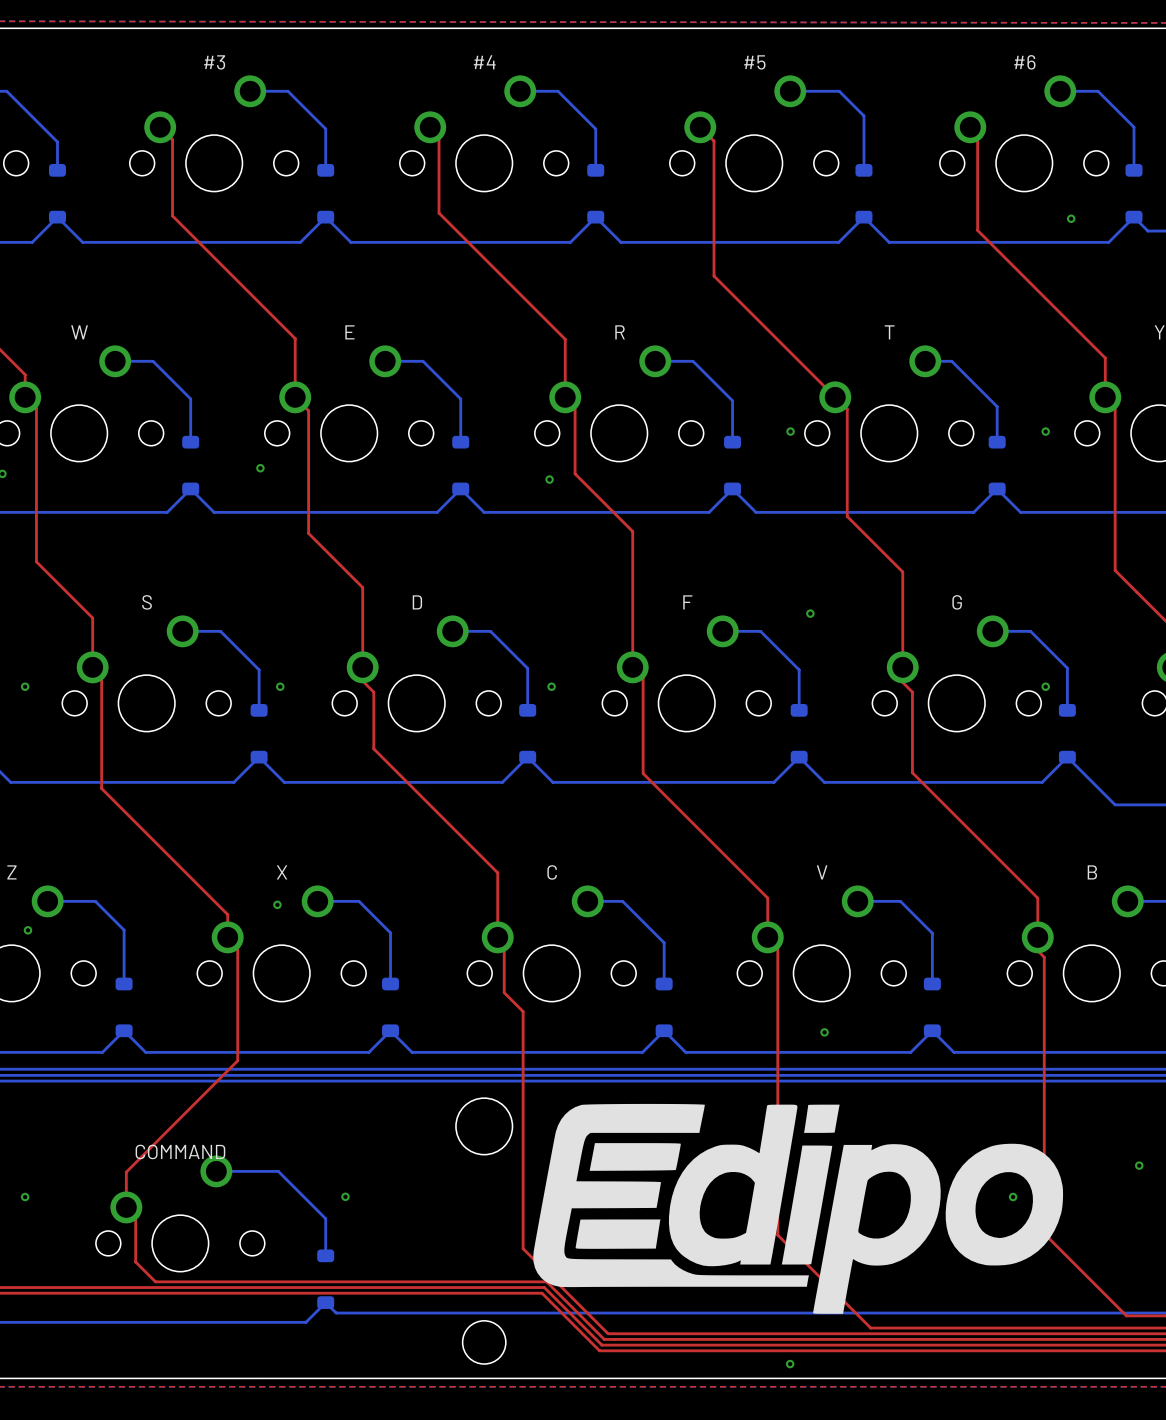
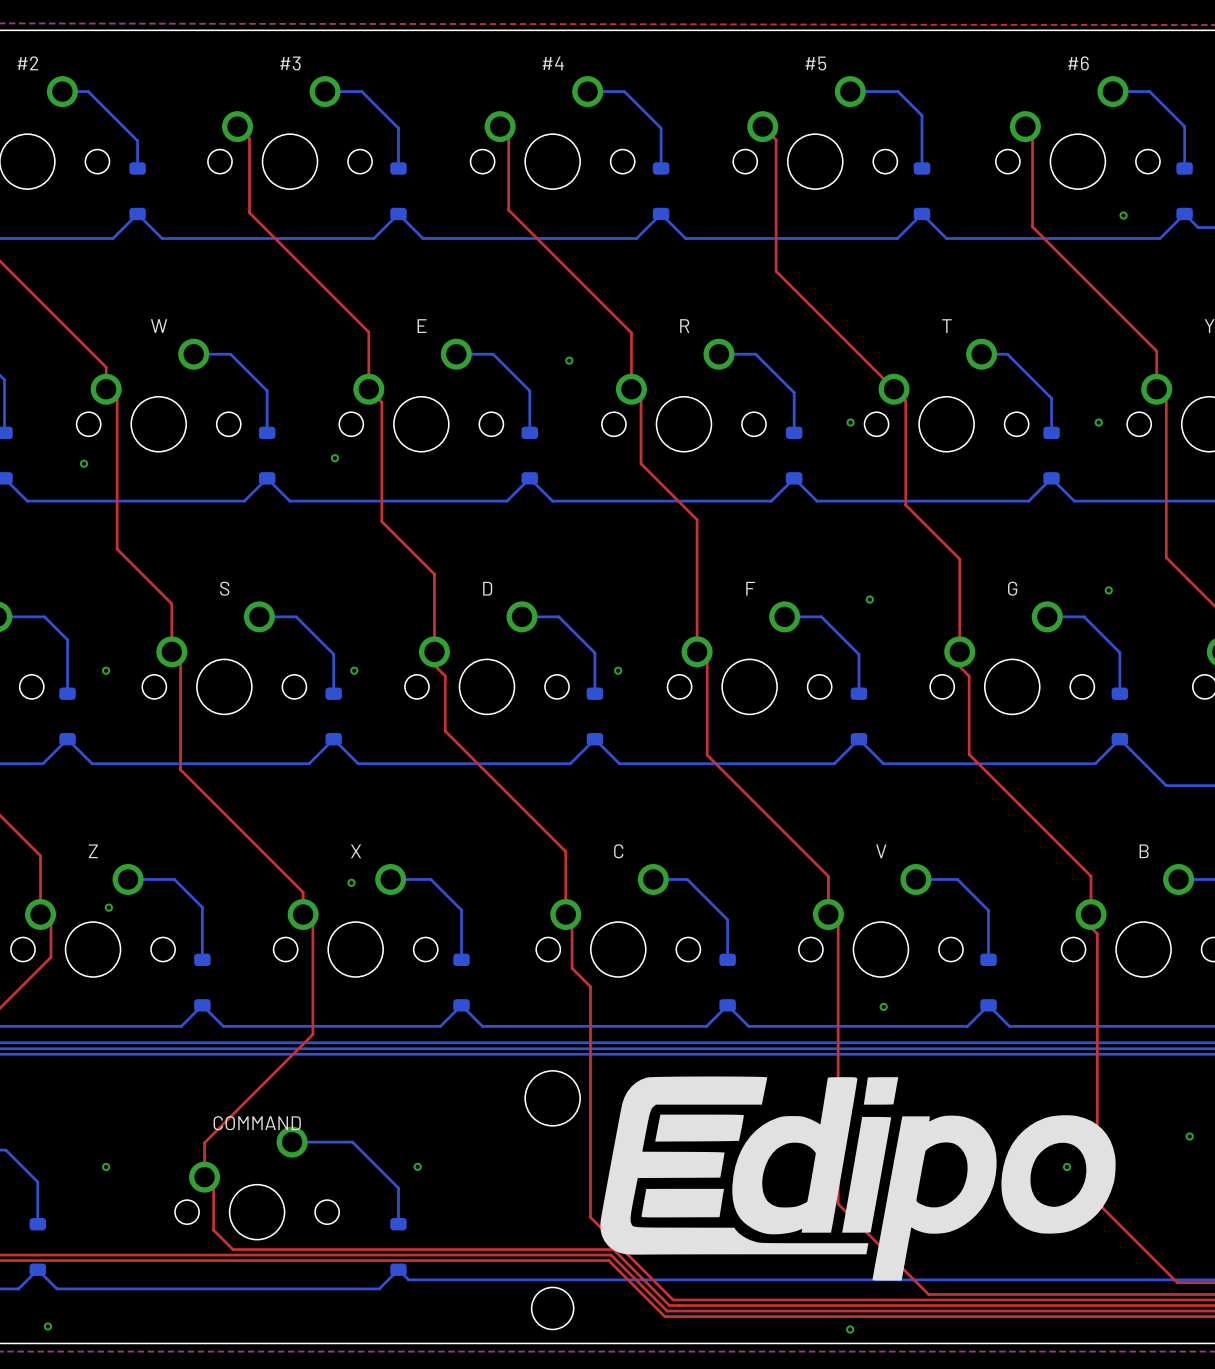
via: none -> (569, 360)
via: (549, 479) -> none
via position: (1045, 686) -> (1108, 590)

